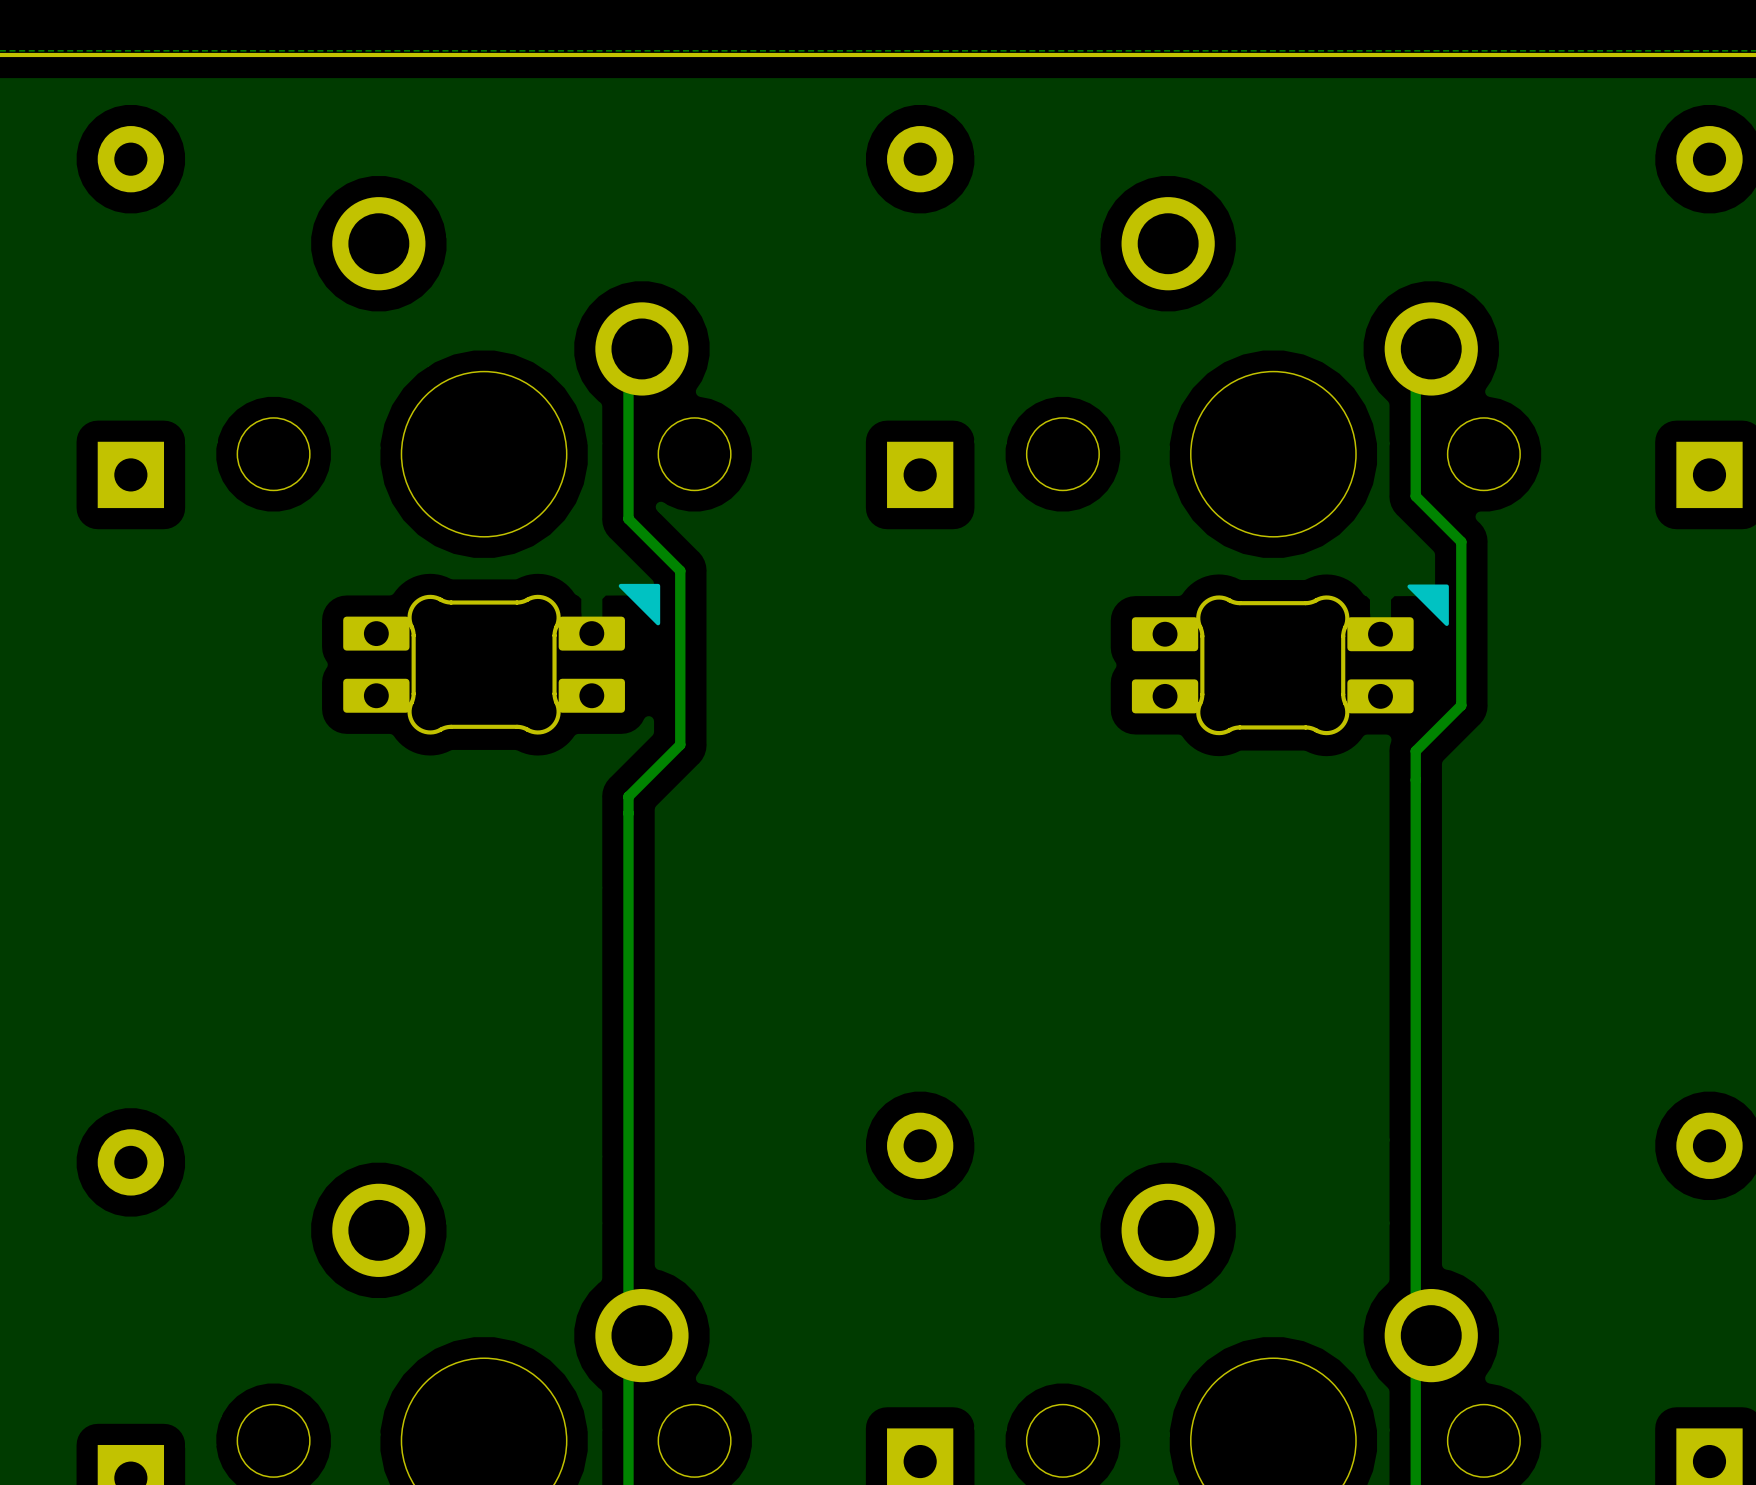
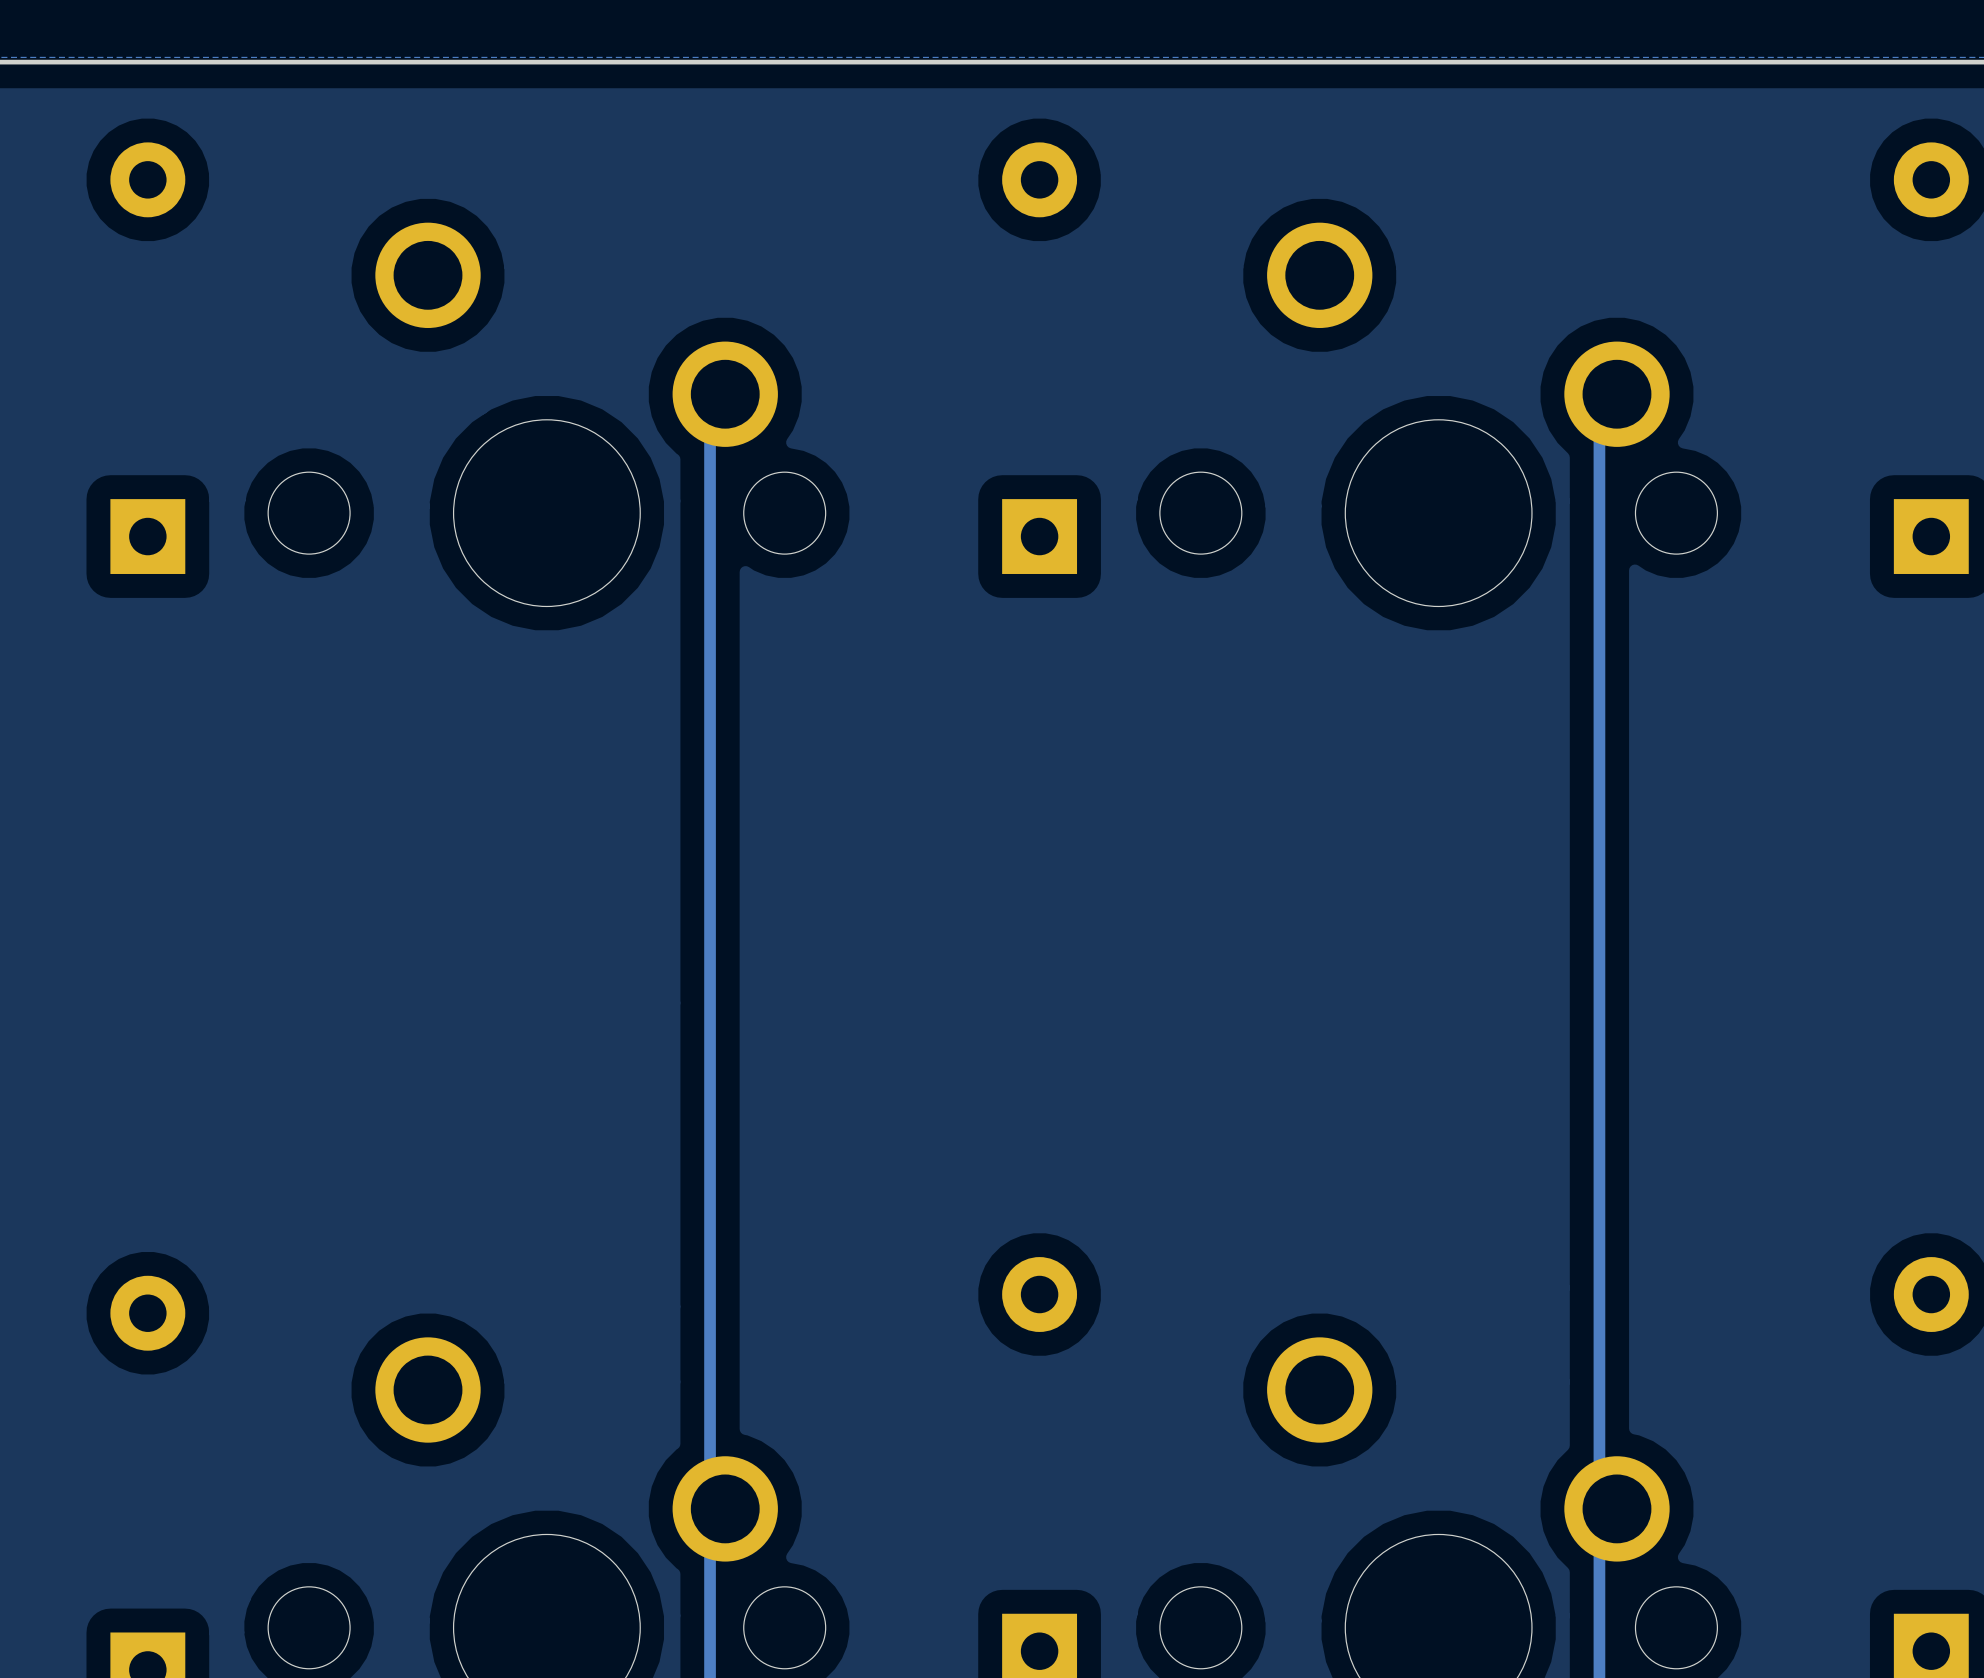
track: (1415, 496) (1461, 541) (1461, 705) (1415, 751) -> (1599, 560) (1599, 848)
track: (628, 519) (680, 570) (680, 744) (628, 796) -> (710, 586) (710, 900)
part: (501, 659) -> none
part: (1290, 659) -> none

